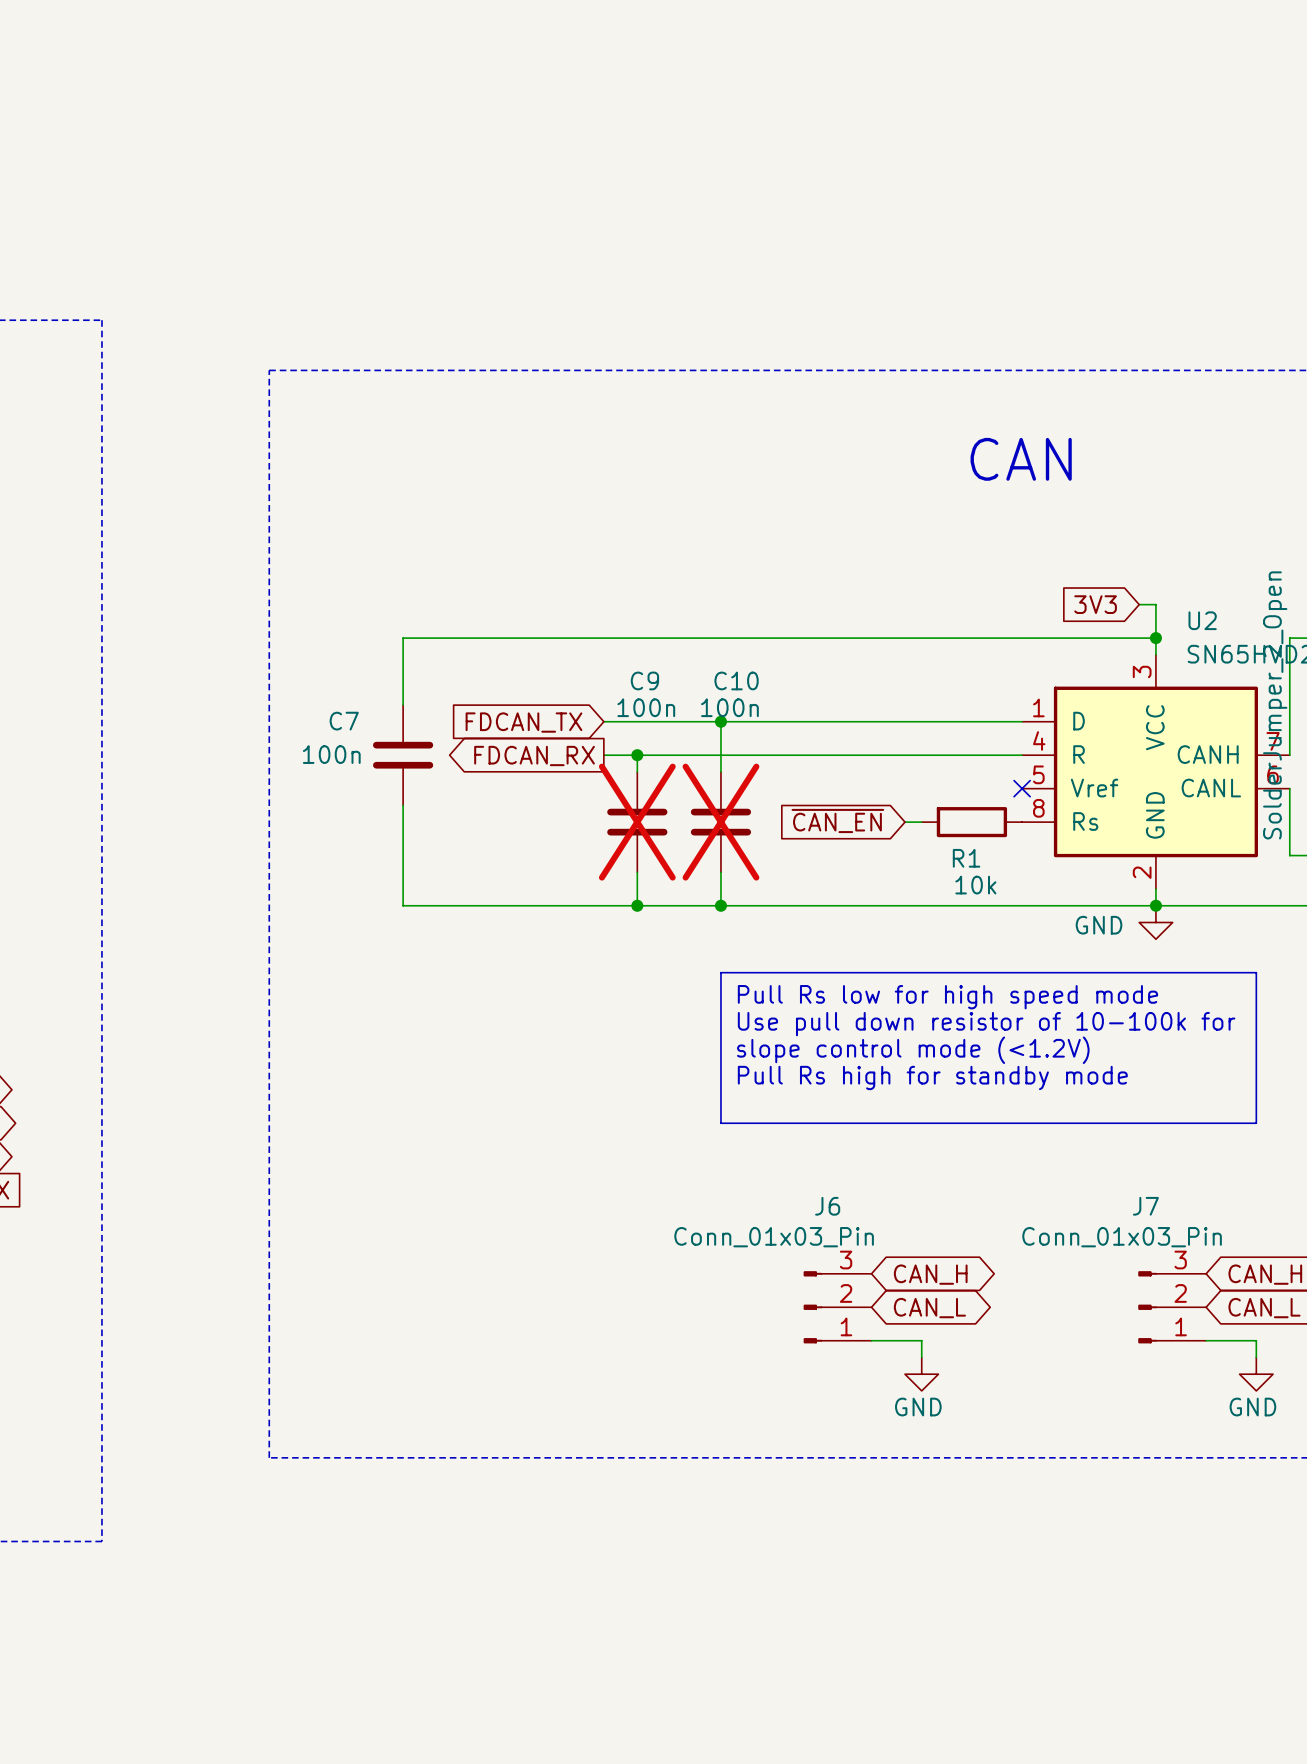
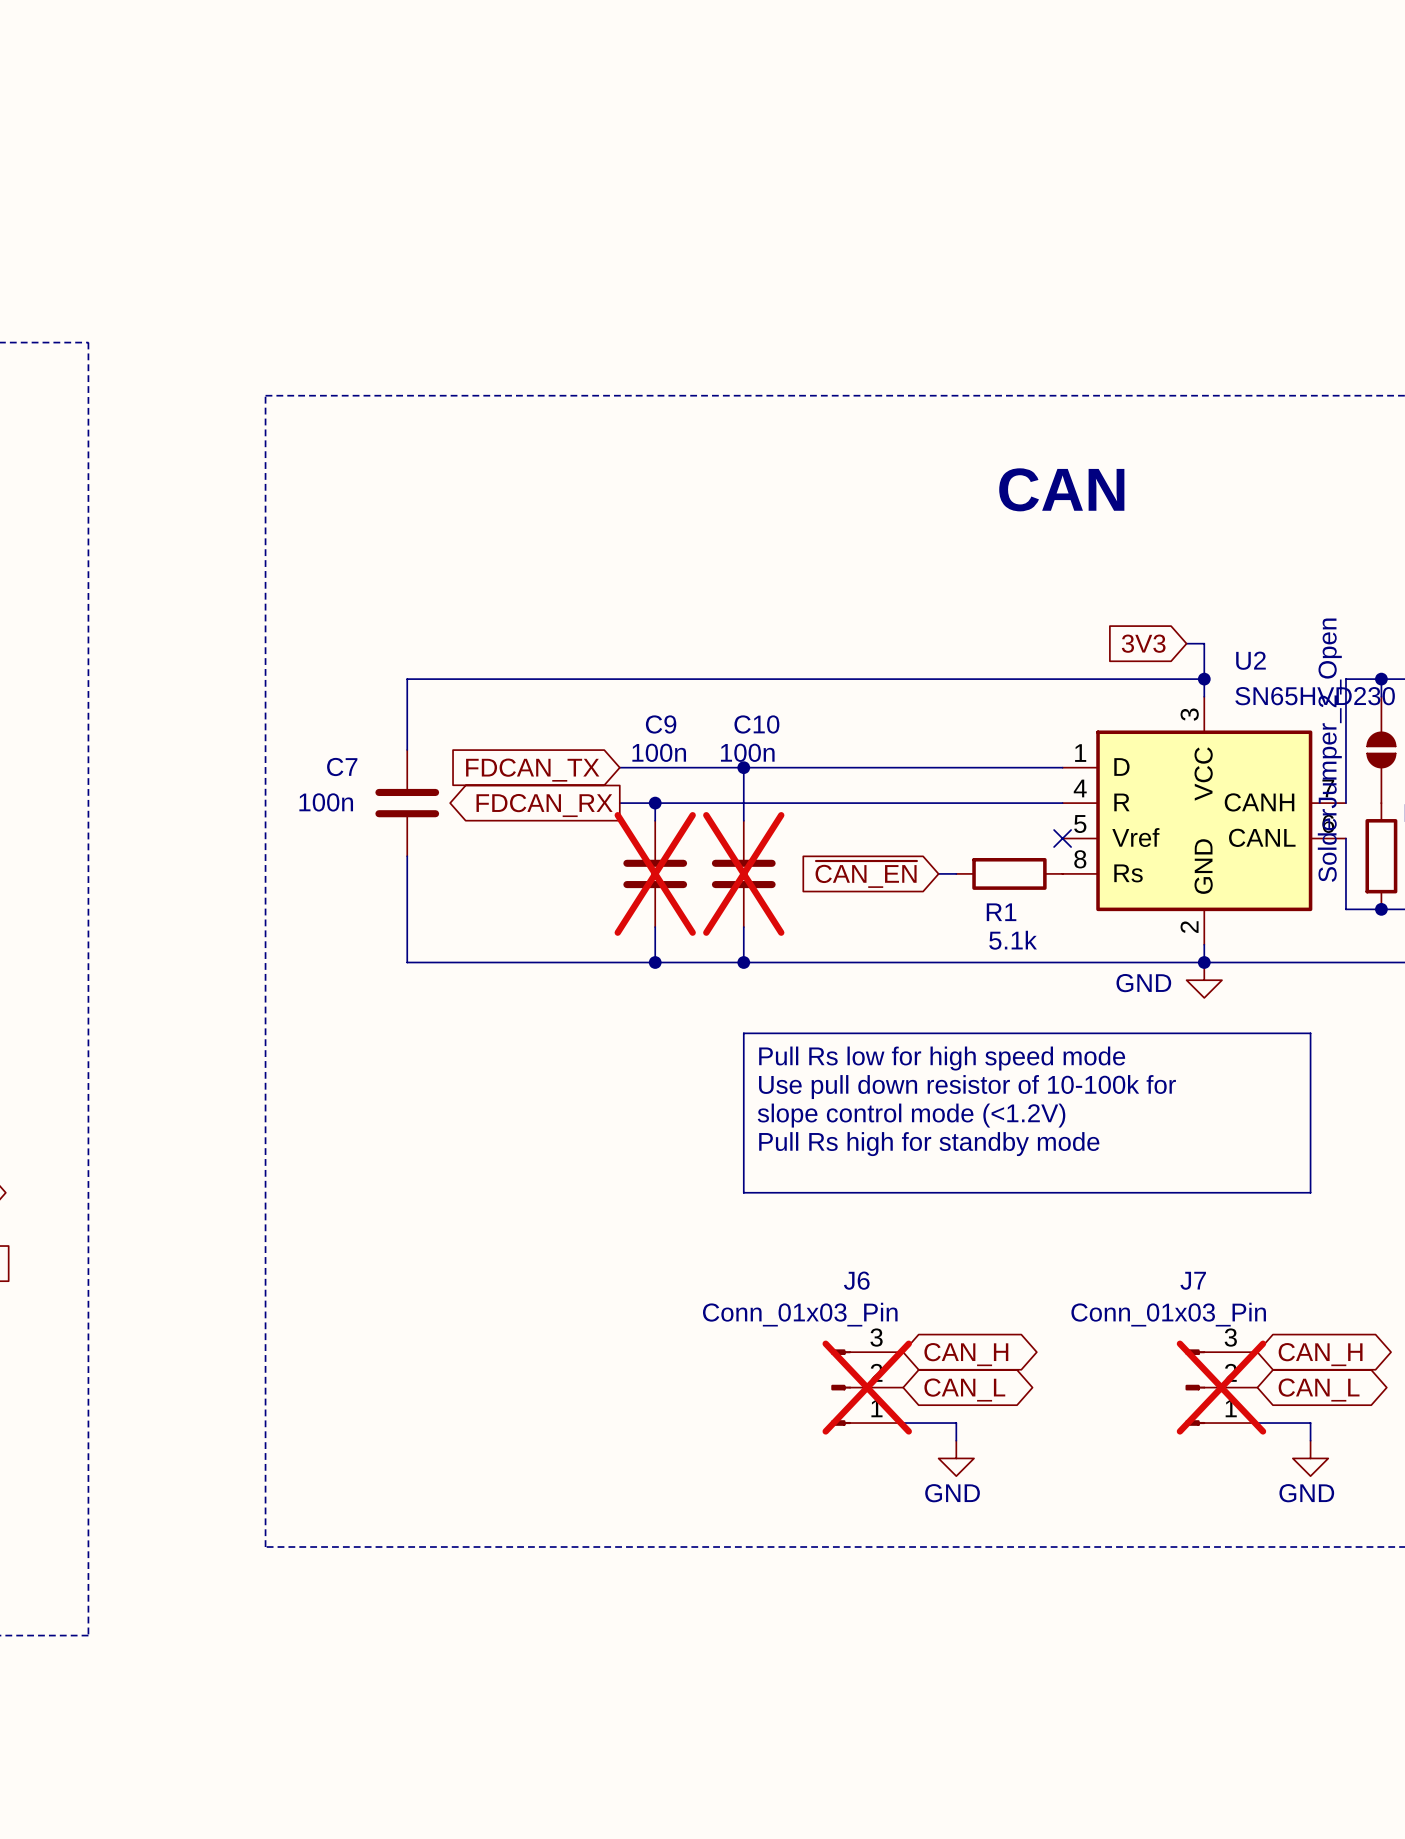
R1 value: 10k (975, 885) -> 5.1k (1013, 940)
J6 do-not-place cross: none -> (867, 1387)
J7 do-not-place cross: none -> (1221, 1387)

